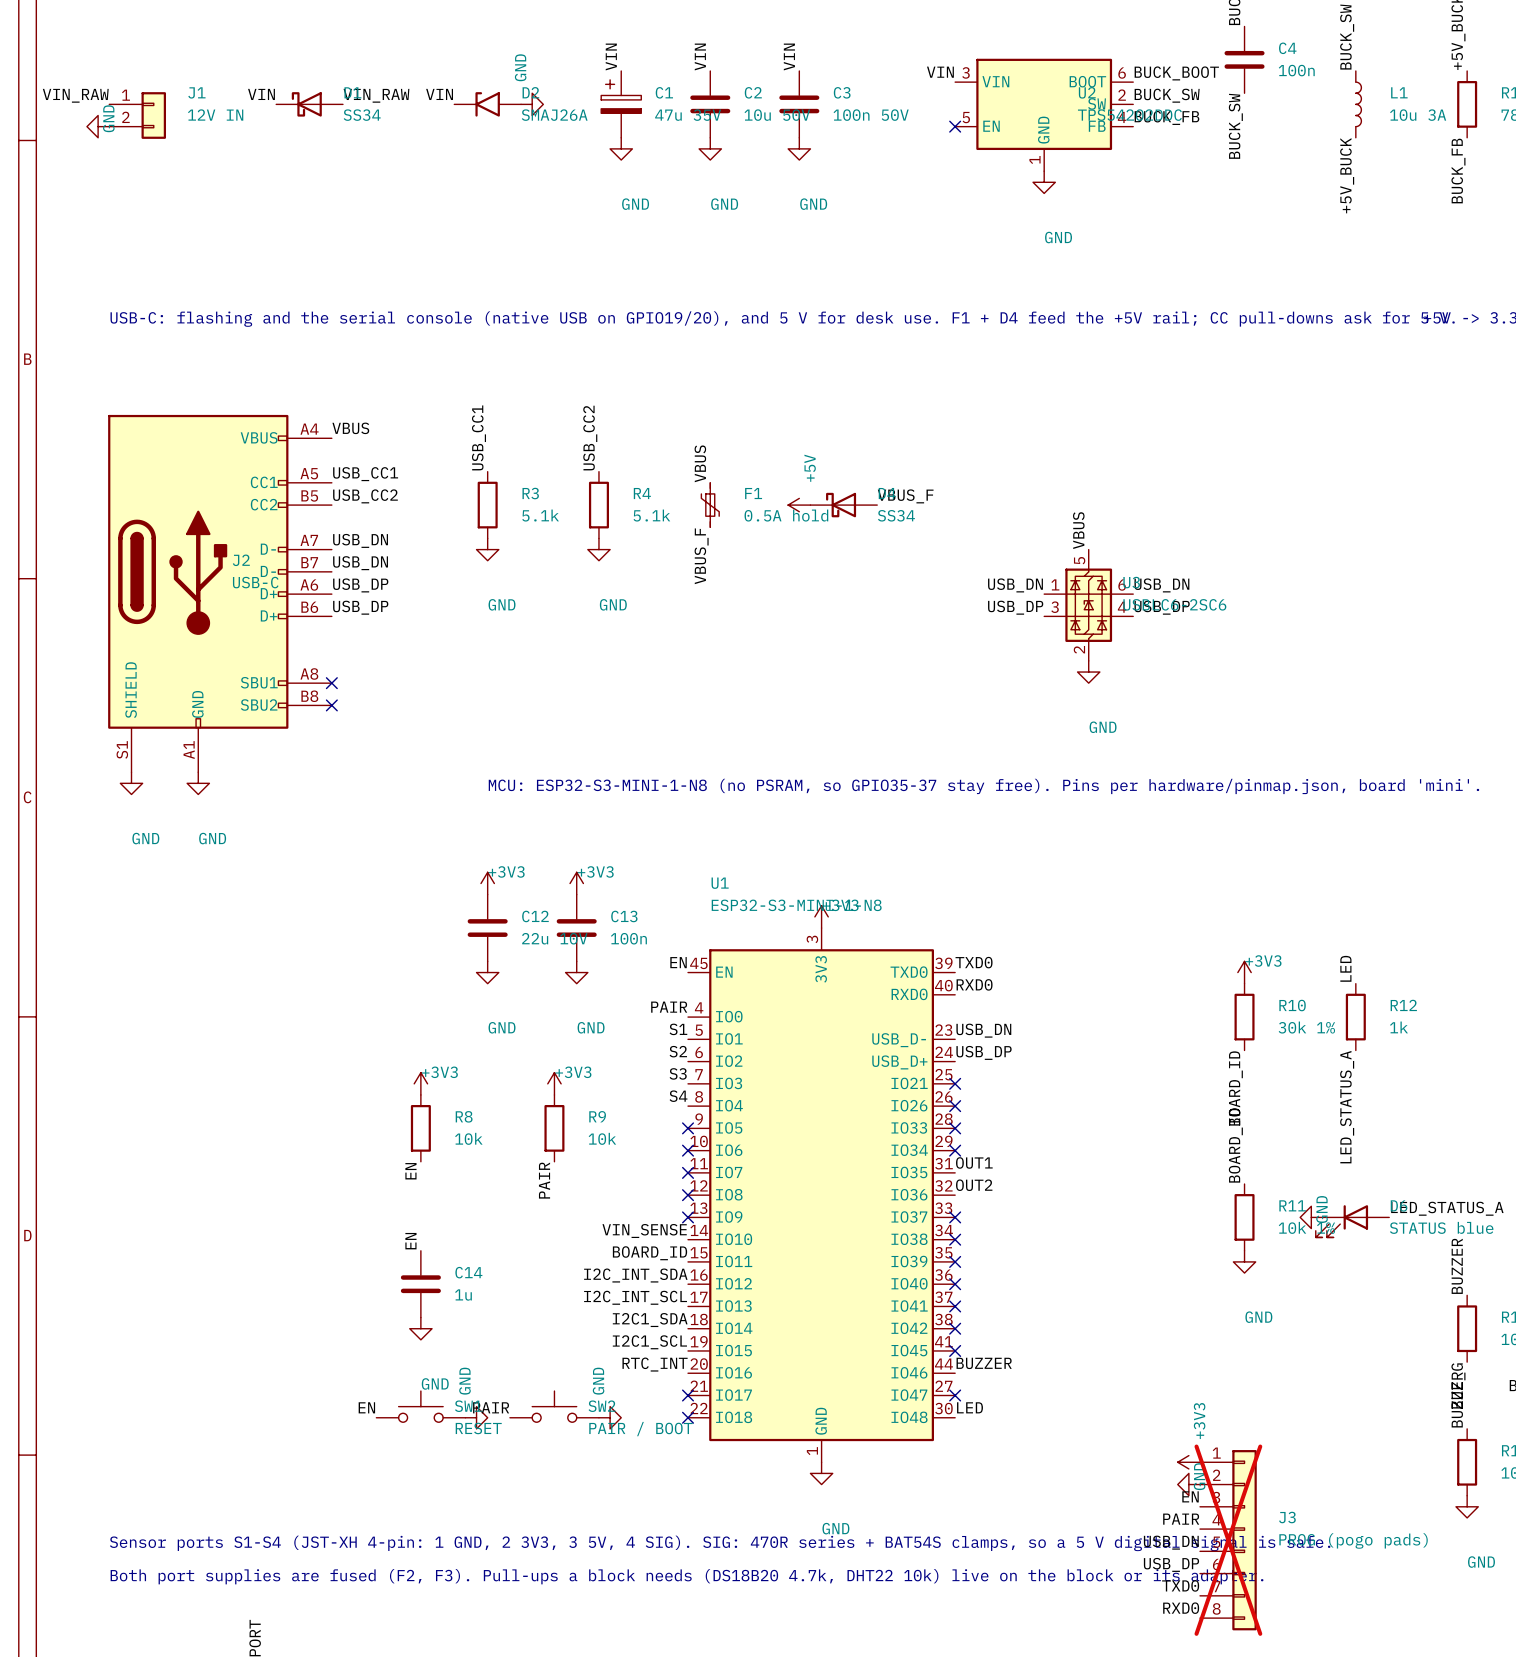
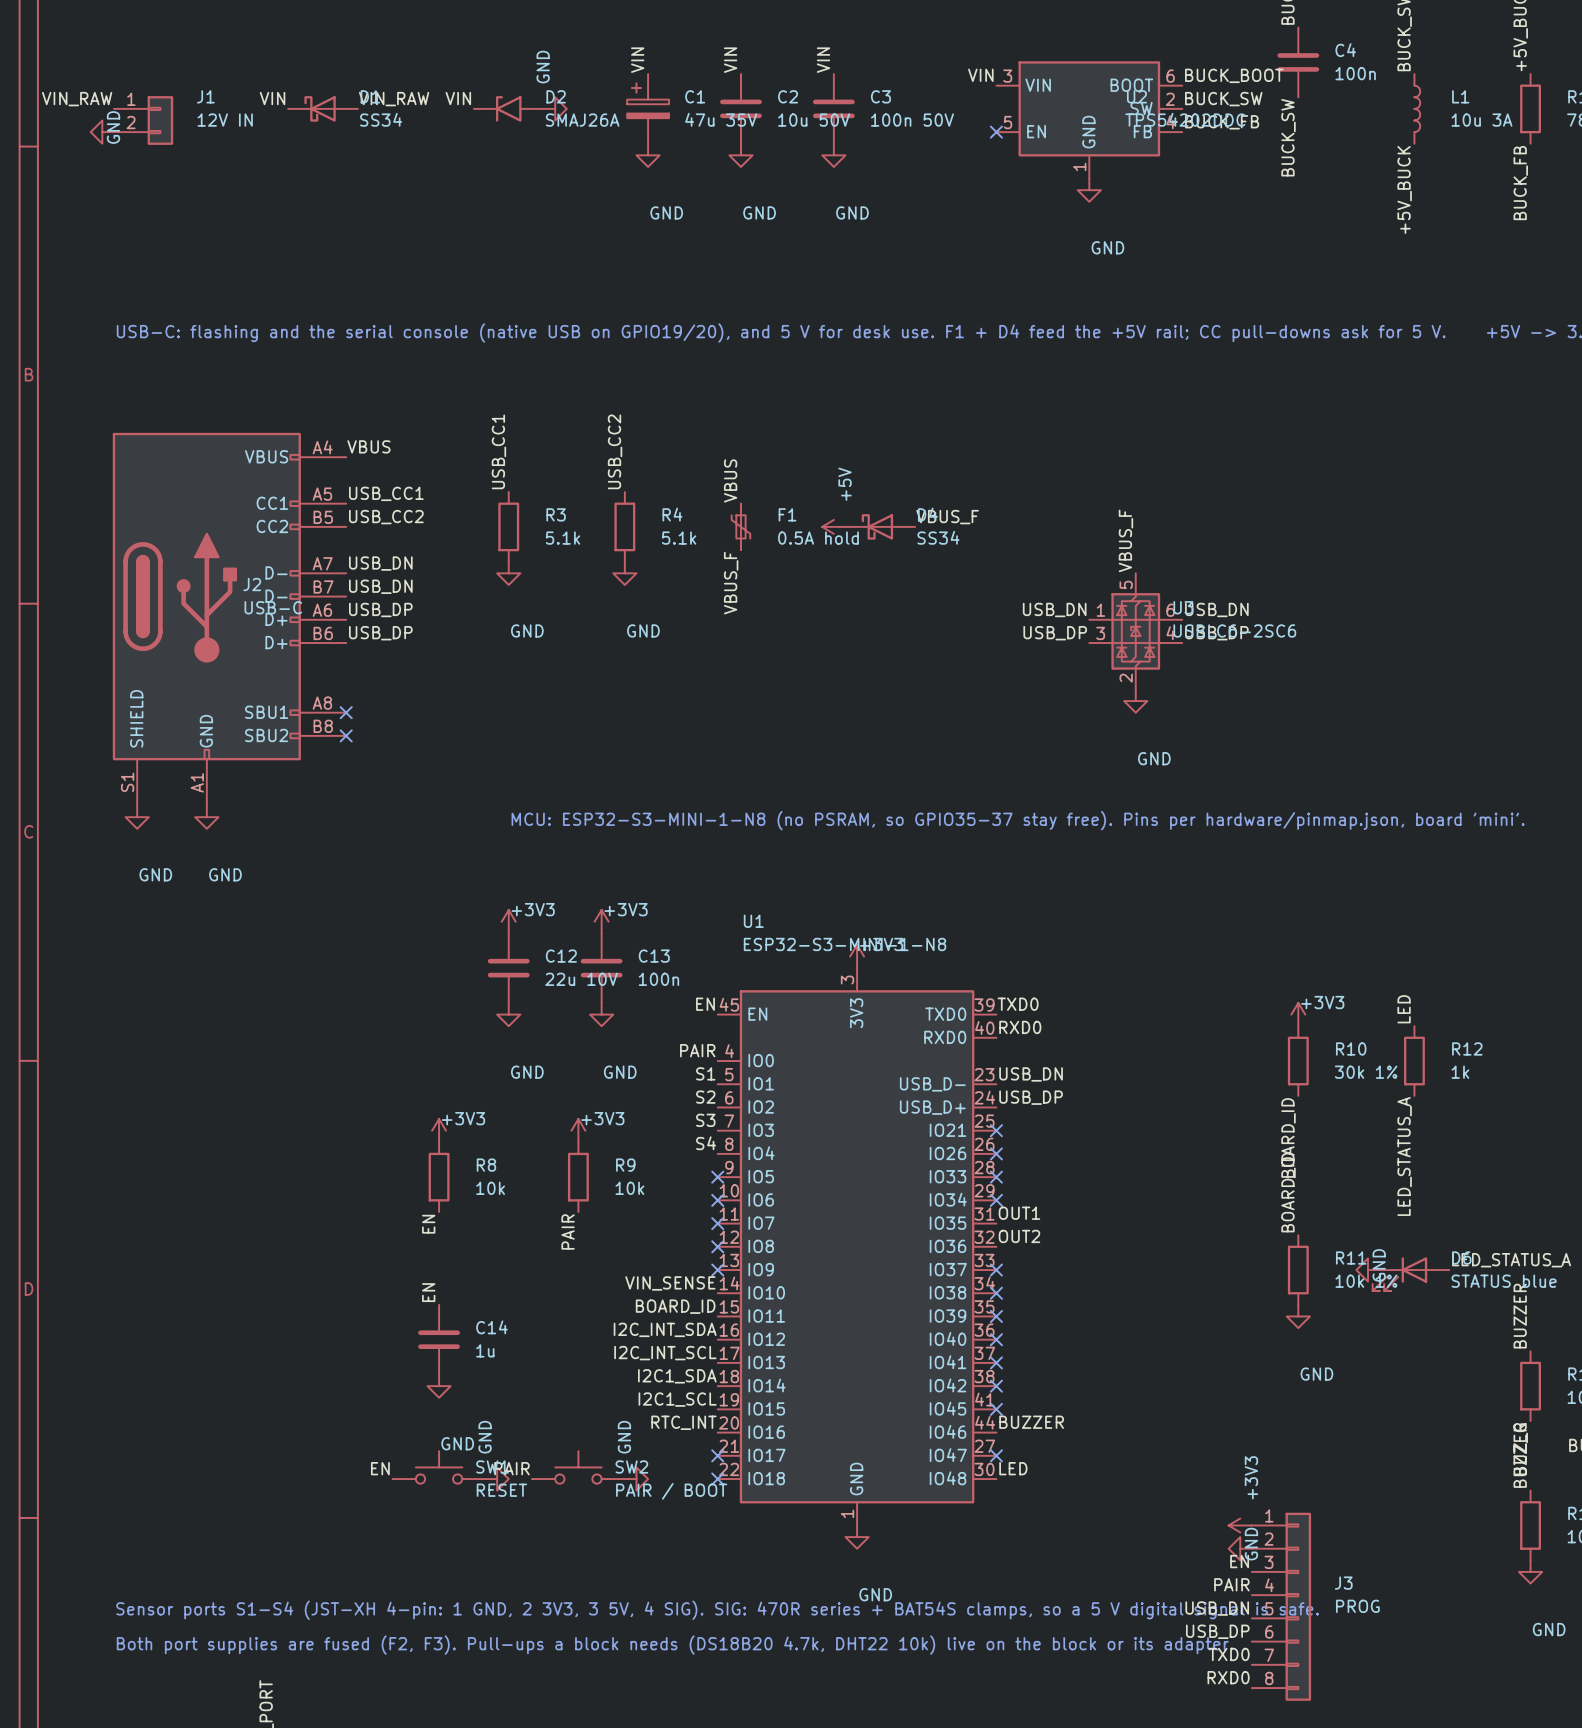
label: VBUS (1078, 530) -> VBUS_F (1125, 540)
J3 do-not-place cross: (1228, 1540) -> none
J3 value: PROG (pogo pads) (1353, 1540) -> PROG (1357, 1606)

